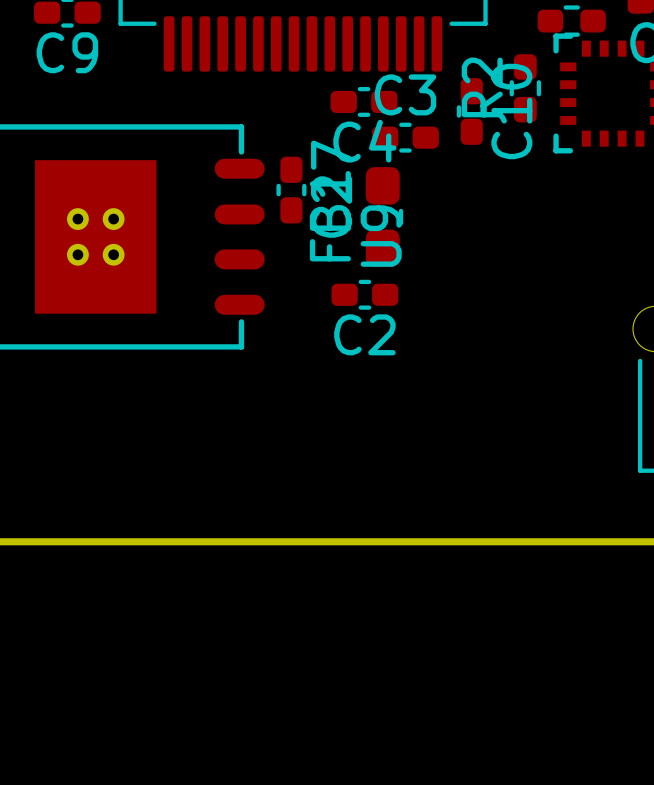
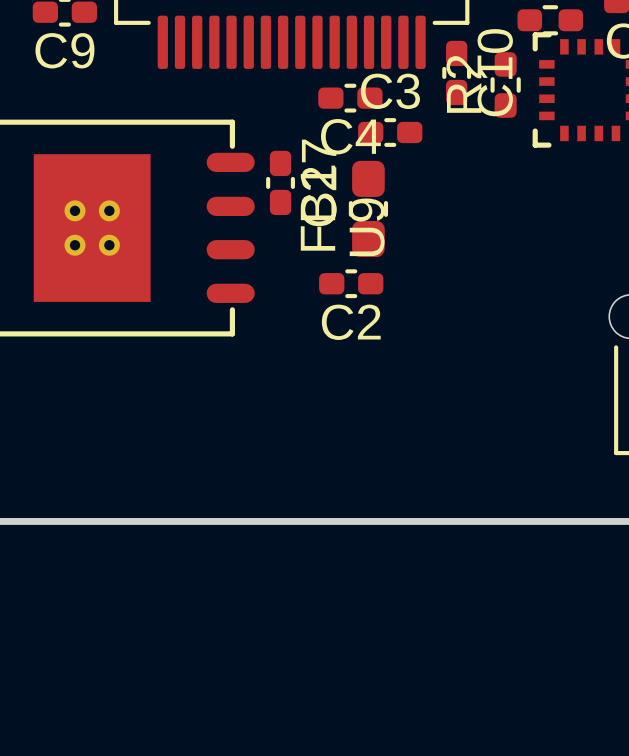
C10 position: (471, 111) -> (456, 72)

